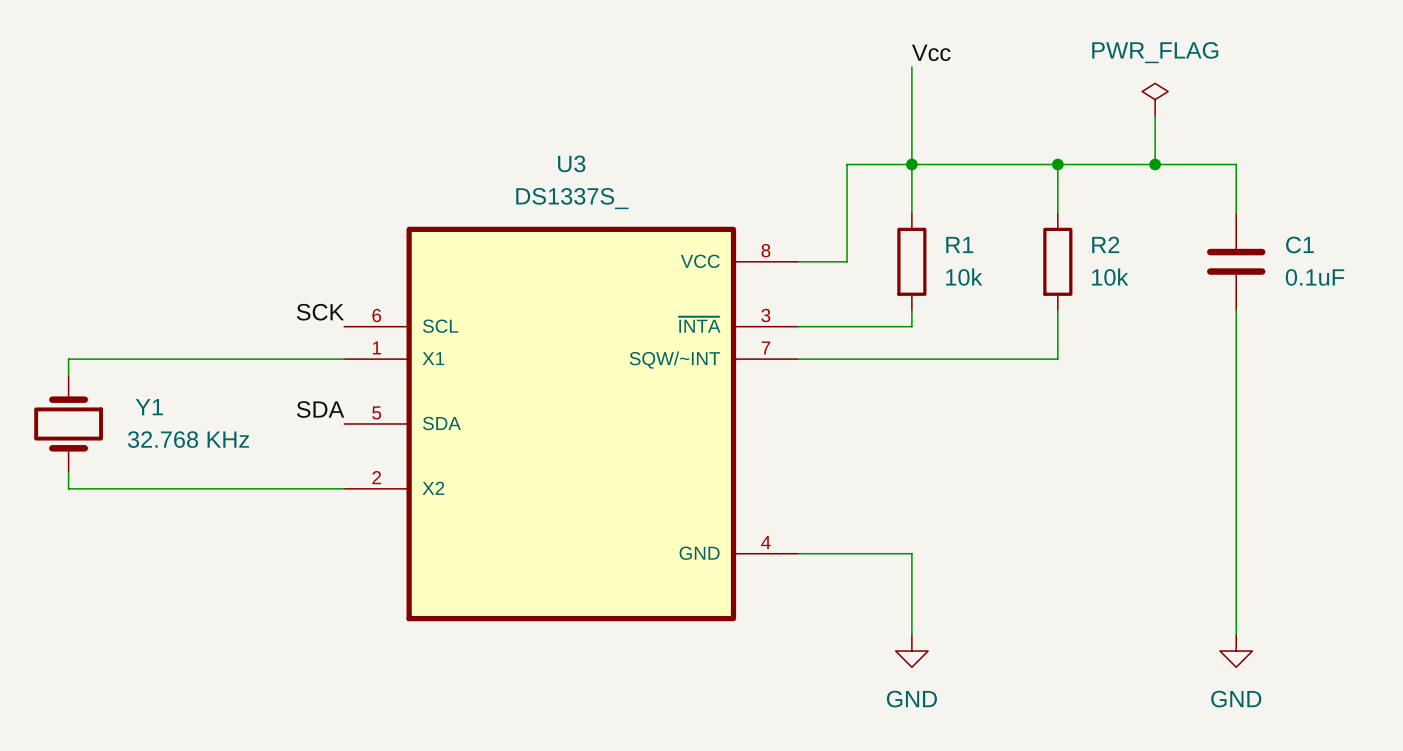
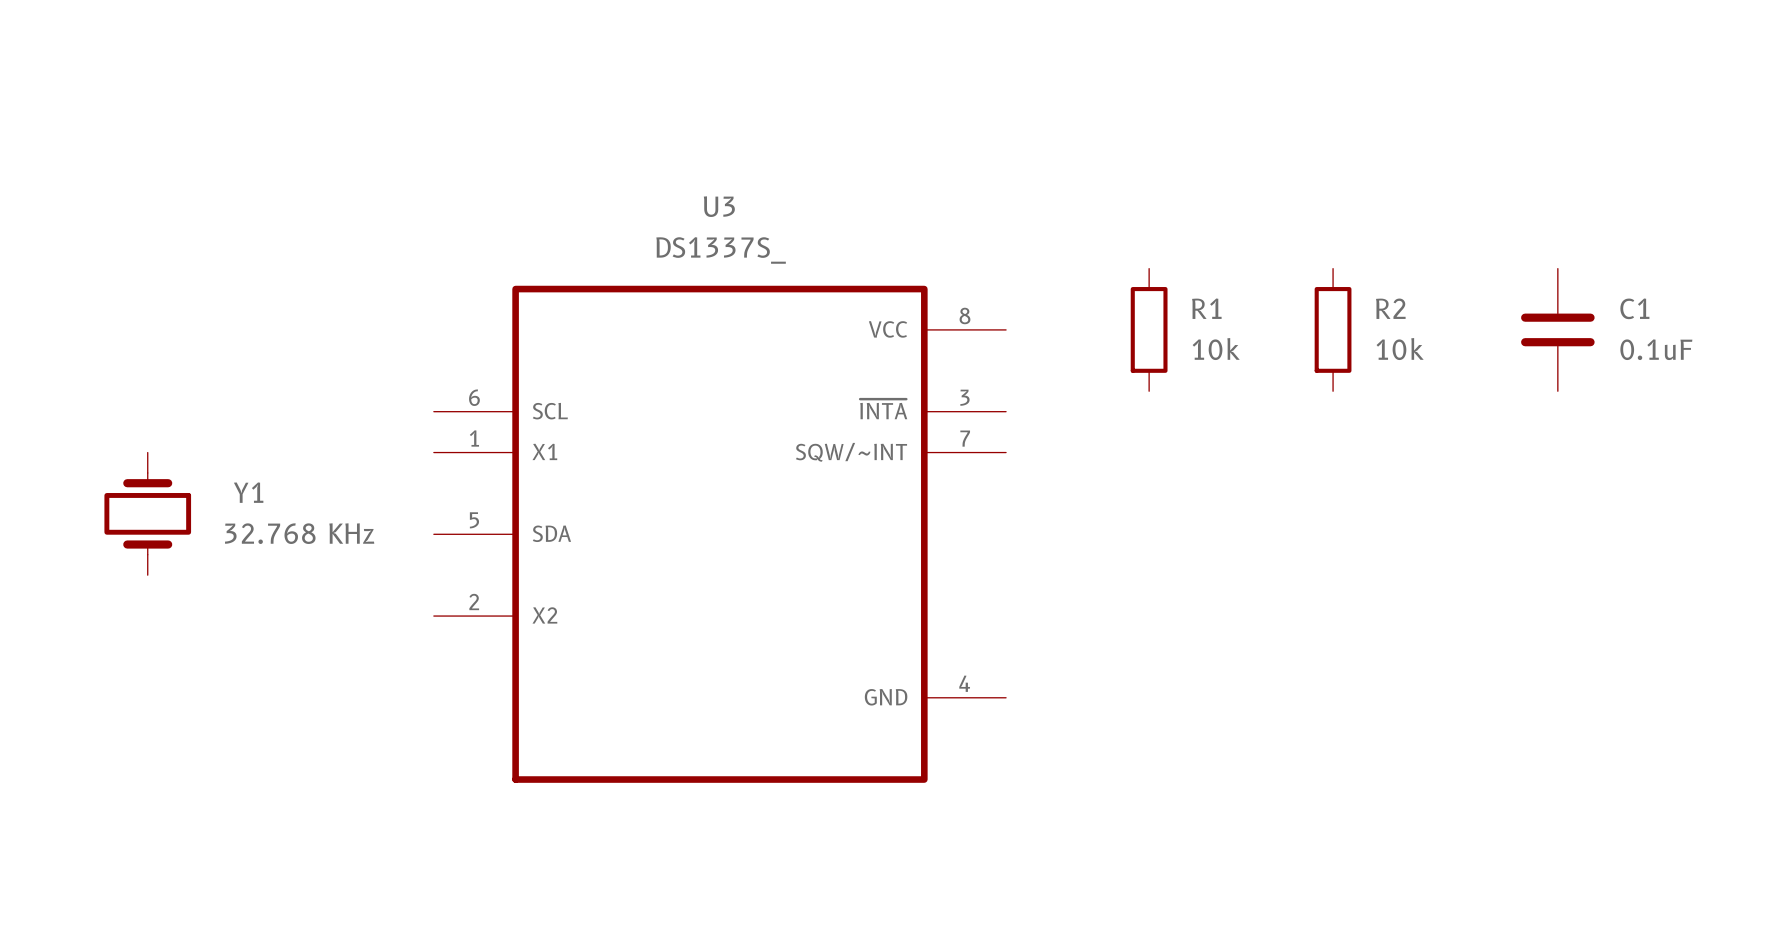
label: Vcc (931, 52) -> none
wire: (911, 67) (911, 213) -> none
power symbol: PWR_FLAG (1155, 99) -> none
wire: (1155, 115) (1155, 164) -> none
junction: (911, 164) -> none
wire: (1057, 164) (1057, 213) -> none
junction: (1057, 164) -> none
junction: (1155, 164) -> none
wire: (1236, 213) (1236, 164) (847, 164) (847, 261) (798, 261) -> none
wire: (911, 310) (911, 326) (798, 326) -> none
wire: (1057, 310) (1057, 359) (798, 359) -> none
wire: (1236, 310) (1236, 634) -> none
label: SCK (320, 312) -> none
wire: (344, 359) (68, 359) (68, 375) -> none
label: SDA (320, 409) -> none
Y1 position: (68, 423) -> (147, 513)
wire: (68, 472) (68, 488) (344, 488) -> none
wire: (798, 553) (911, 553) (911, 634) -> none
power symbol: GND (911, 651) -> none
power symbol: GND (1236, 651) -> none

